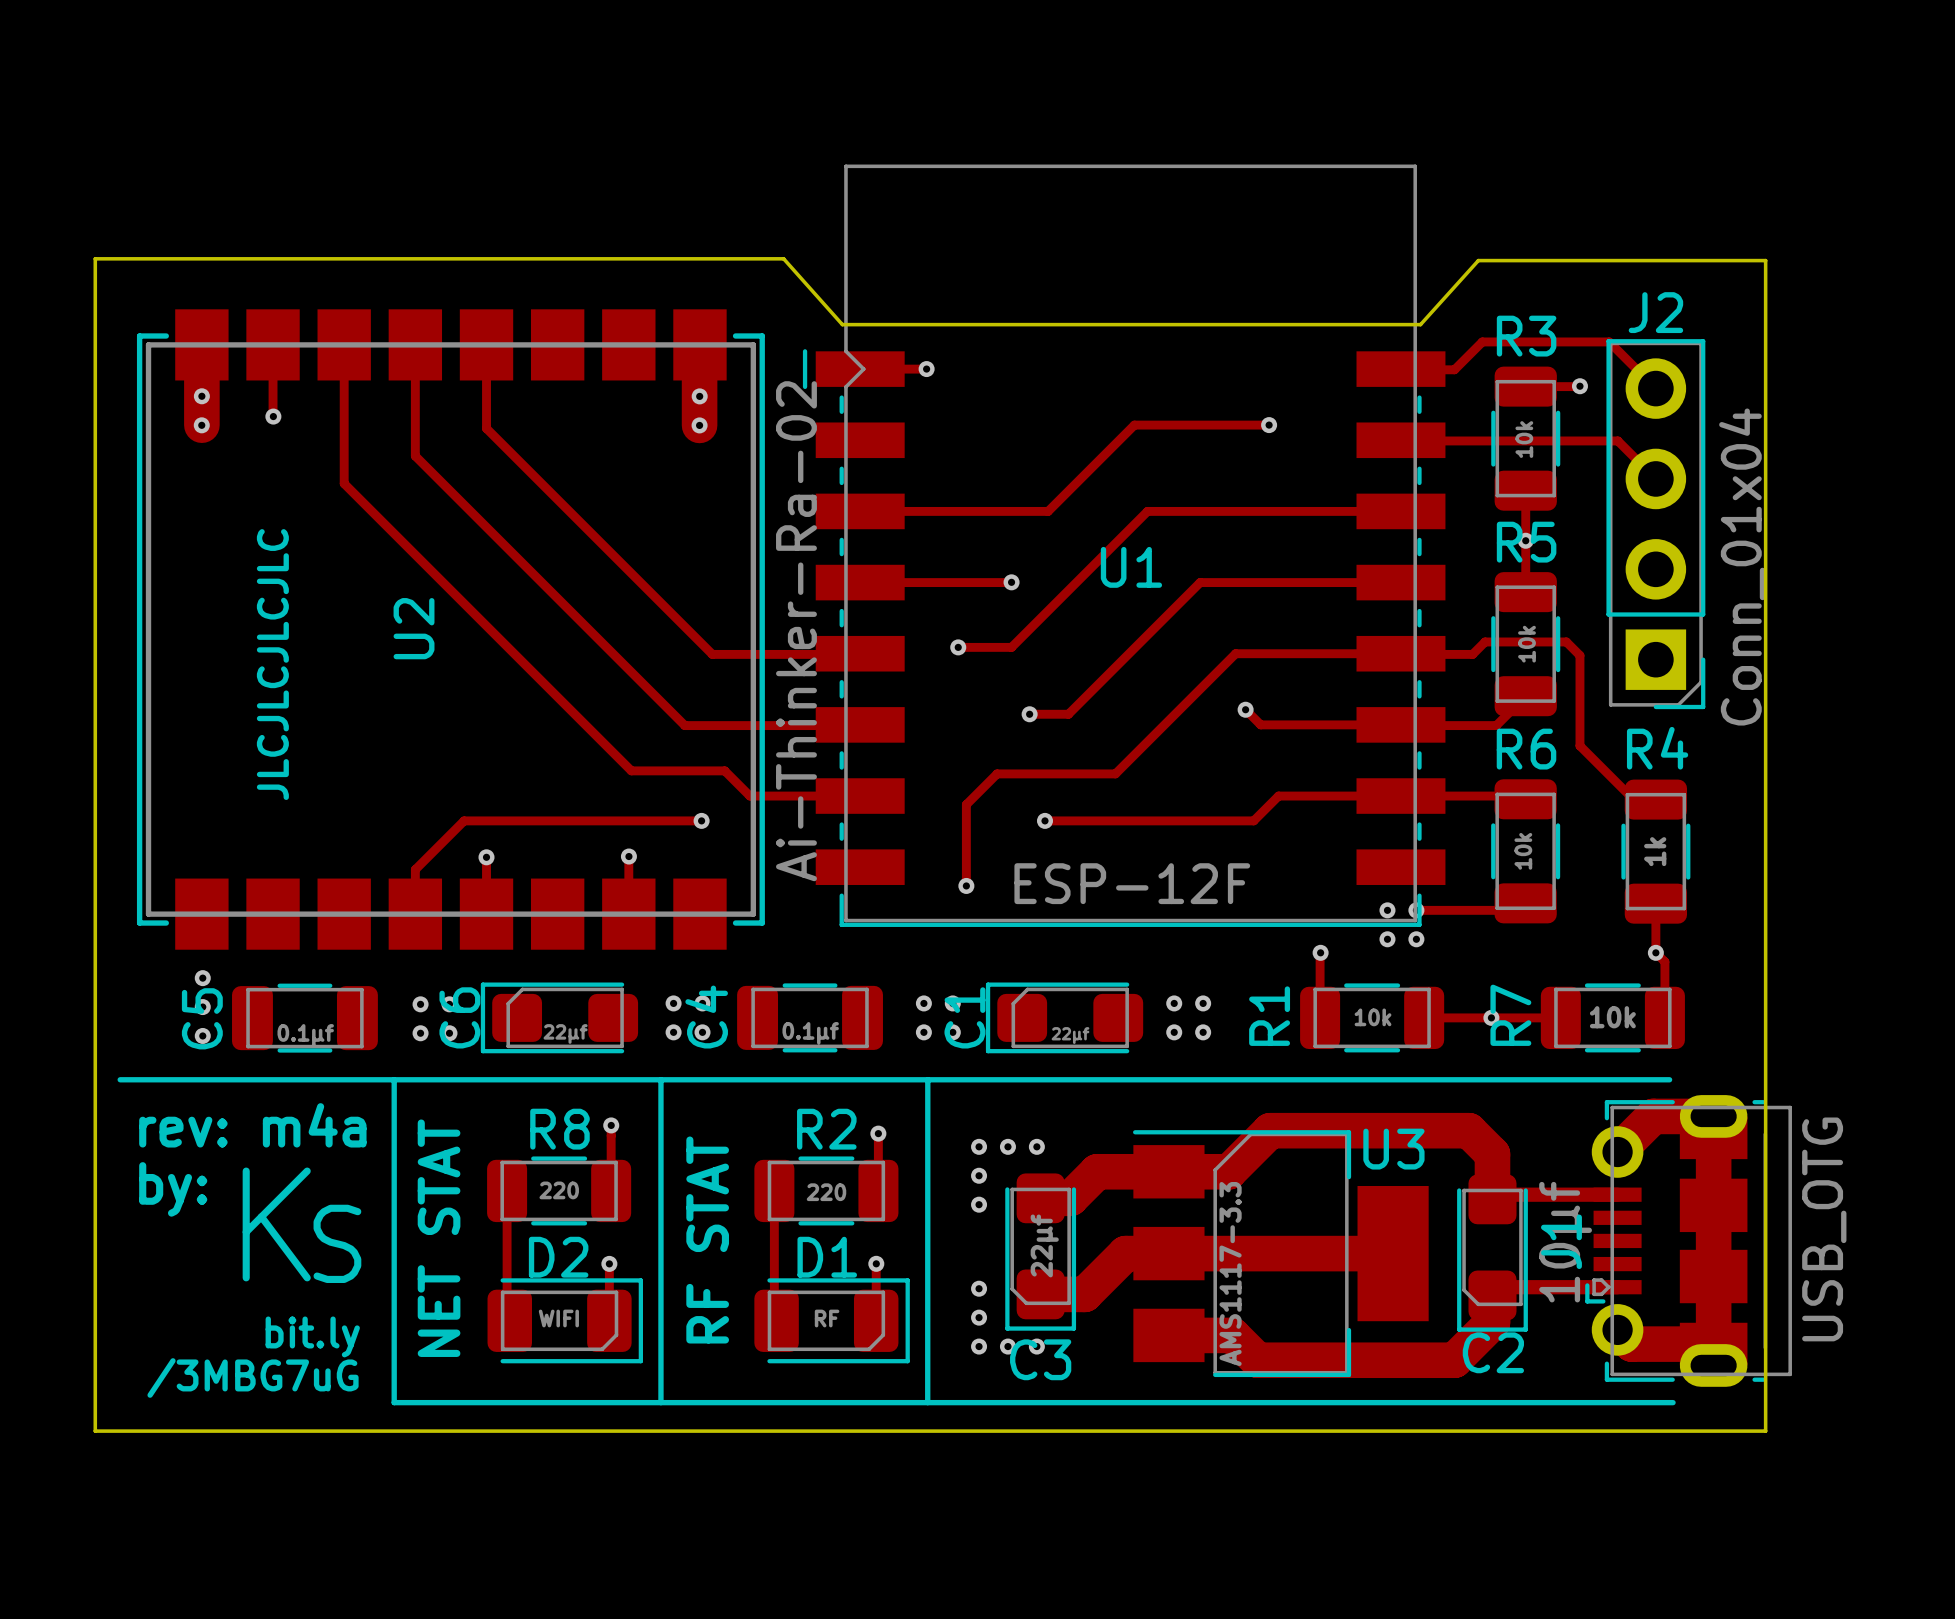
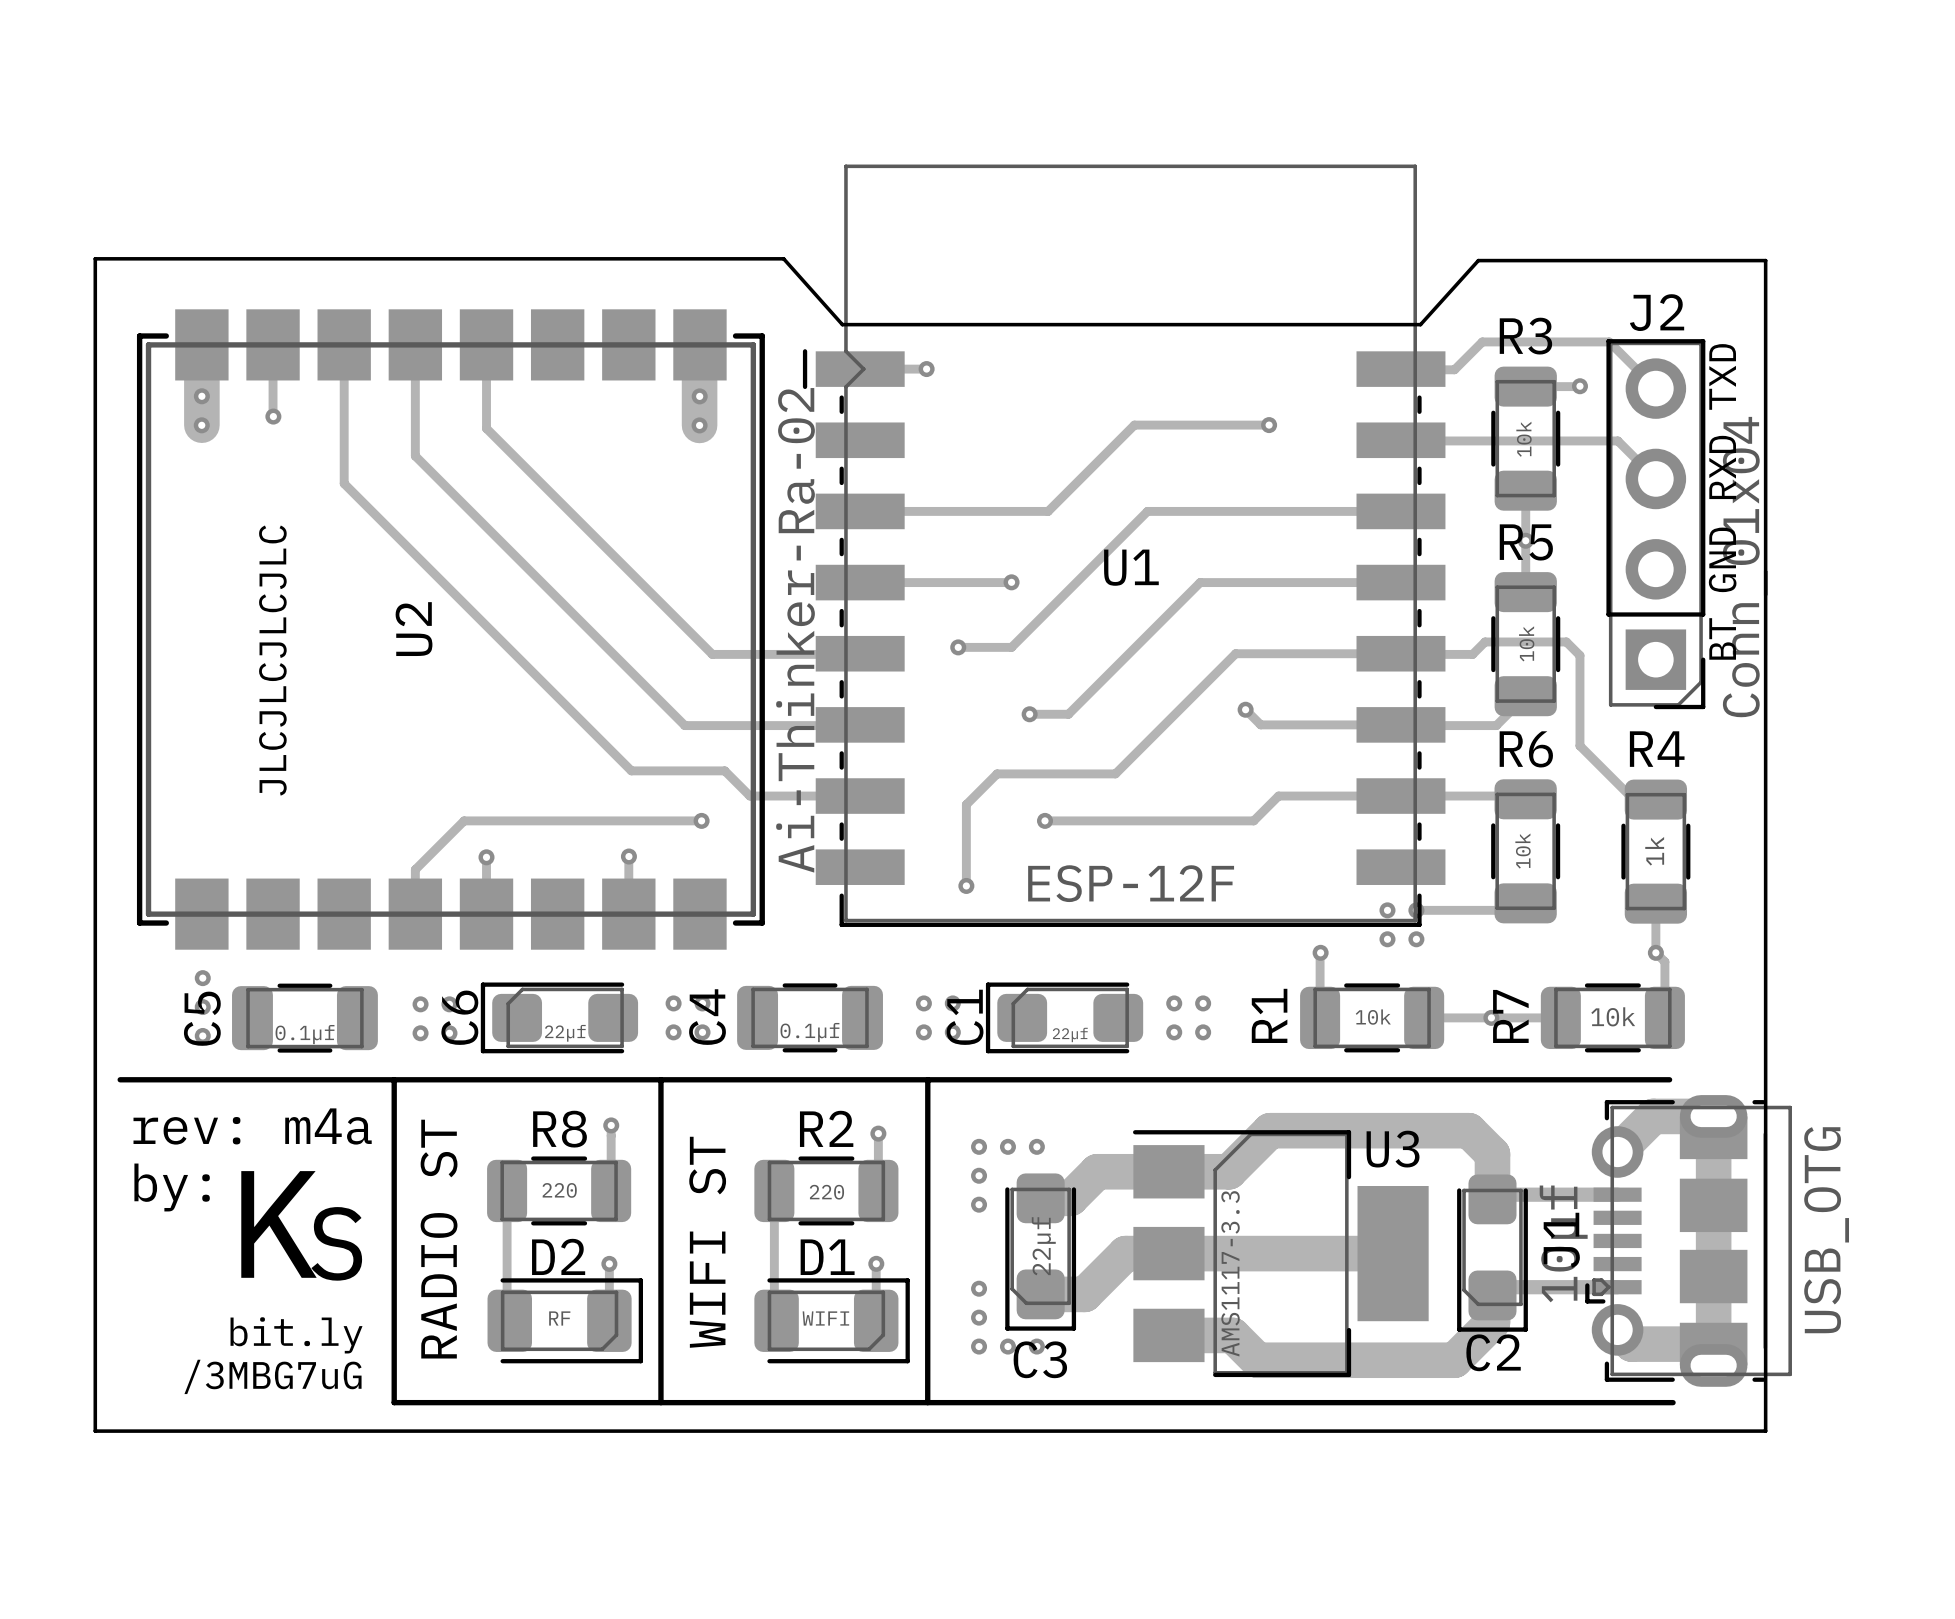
text: none -> BT GND RXD TXD (1722, 501)
text: NET STAT (439, 1238) -> RADIO ST (439, 1239)
text: RF STAT (707, 1240) -> WIFI ST (707, 1242)
D2 value: WIFI (558, 1318) -> RF (559, 1318)
D1 value: RF (827, 1318) -> WIFI (825, 1318)

